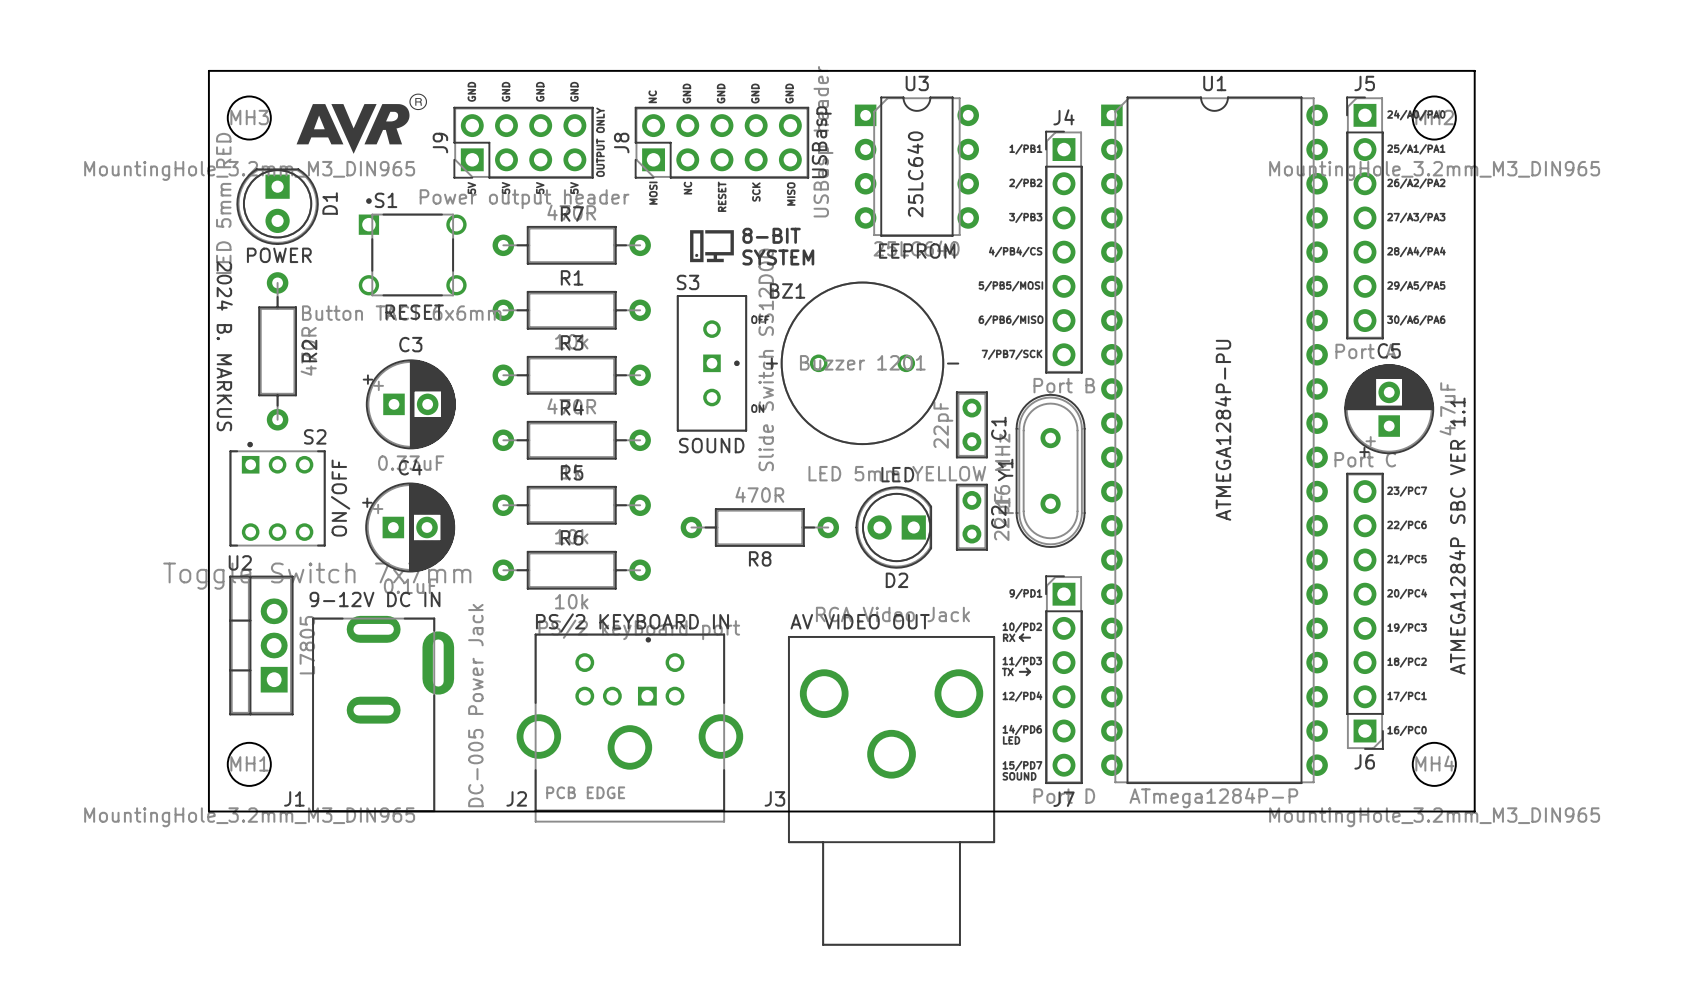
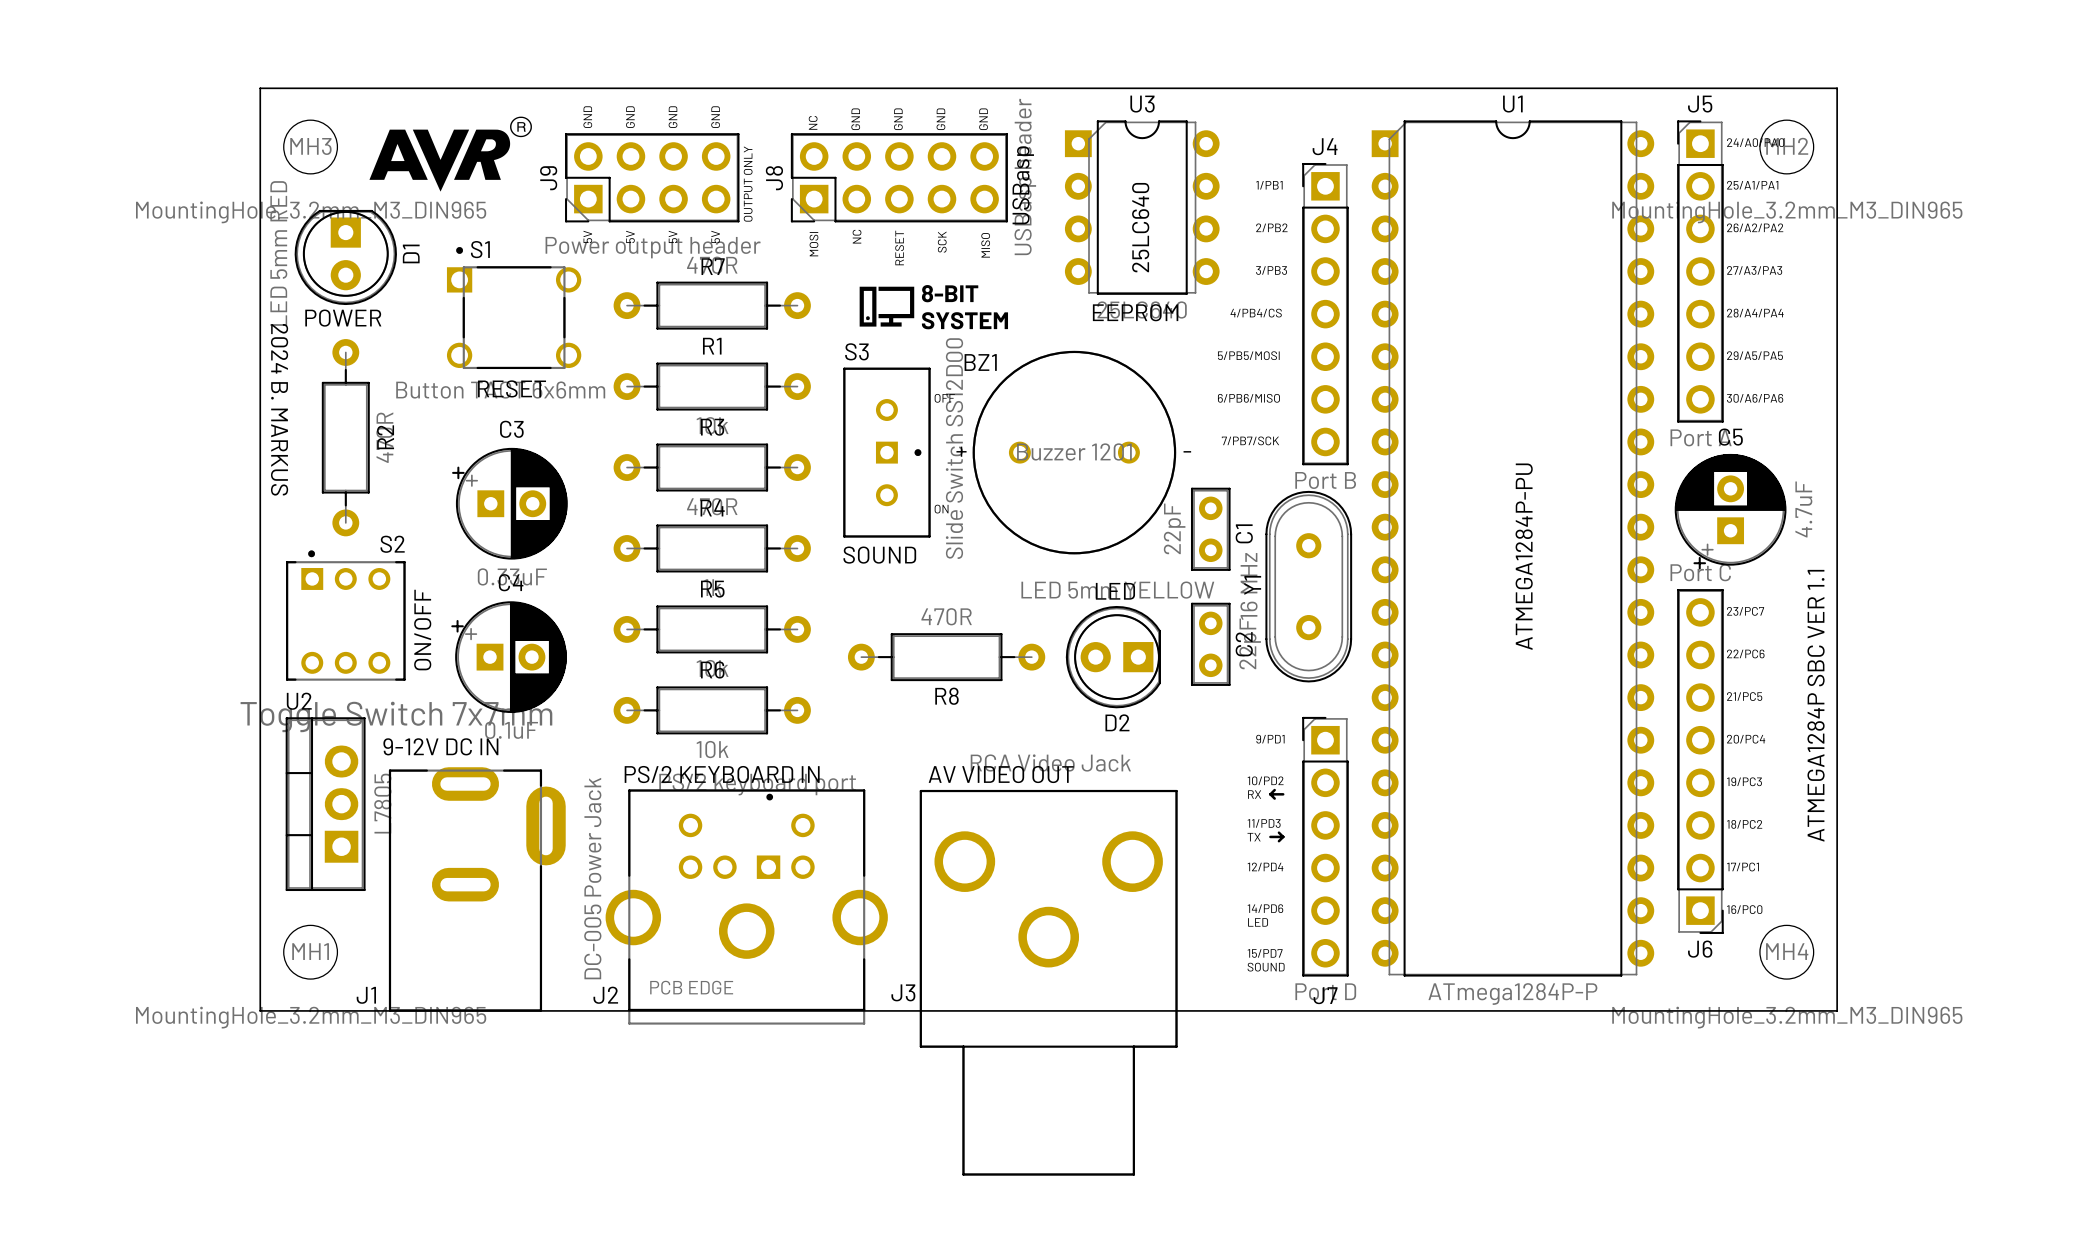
text position: AV VIDEO OUT (860, 621) -> AV VIDEO OUT (1001, 774)
text position: PS/2 KEYBOARD IN (632, 623) -> PS/2 KEYBOARD IN (722, 774)
J2 position: (629, 728) -> (746, 907)
J3 position: (891, 790) -> (1048, 982)

